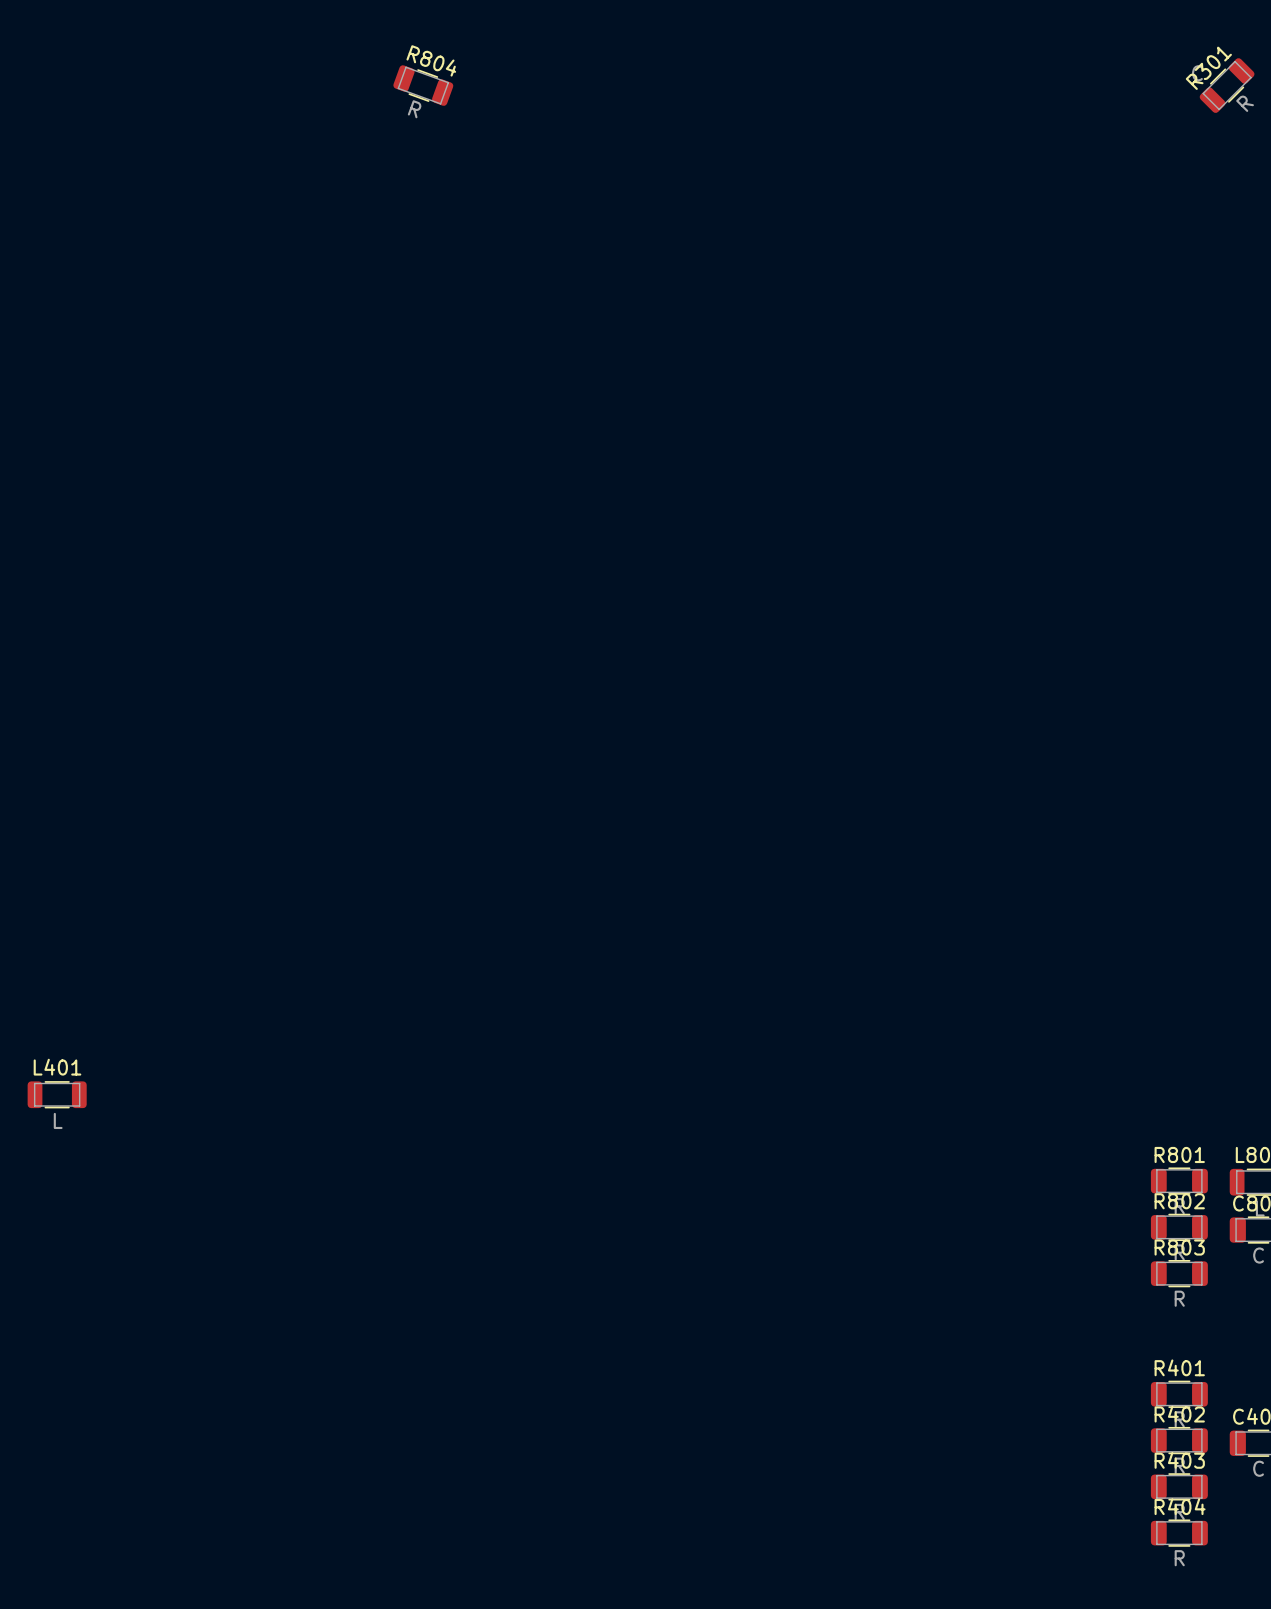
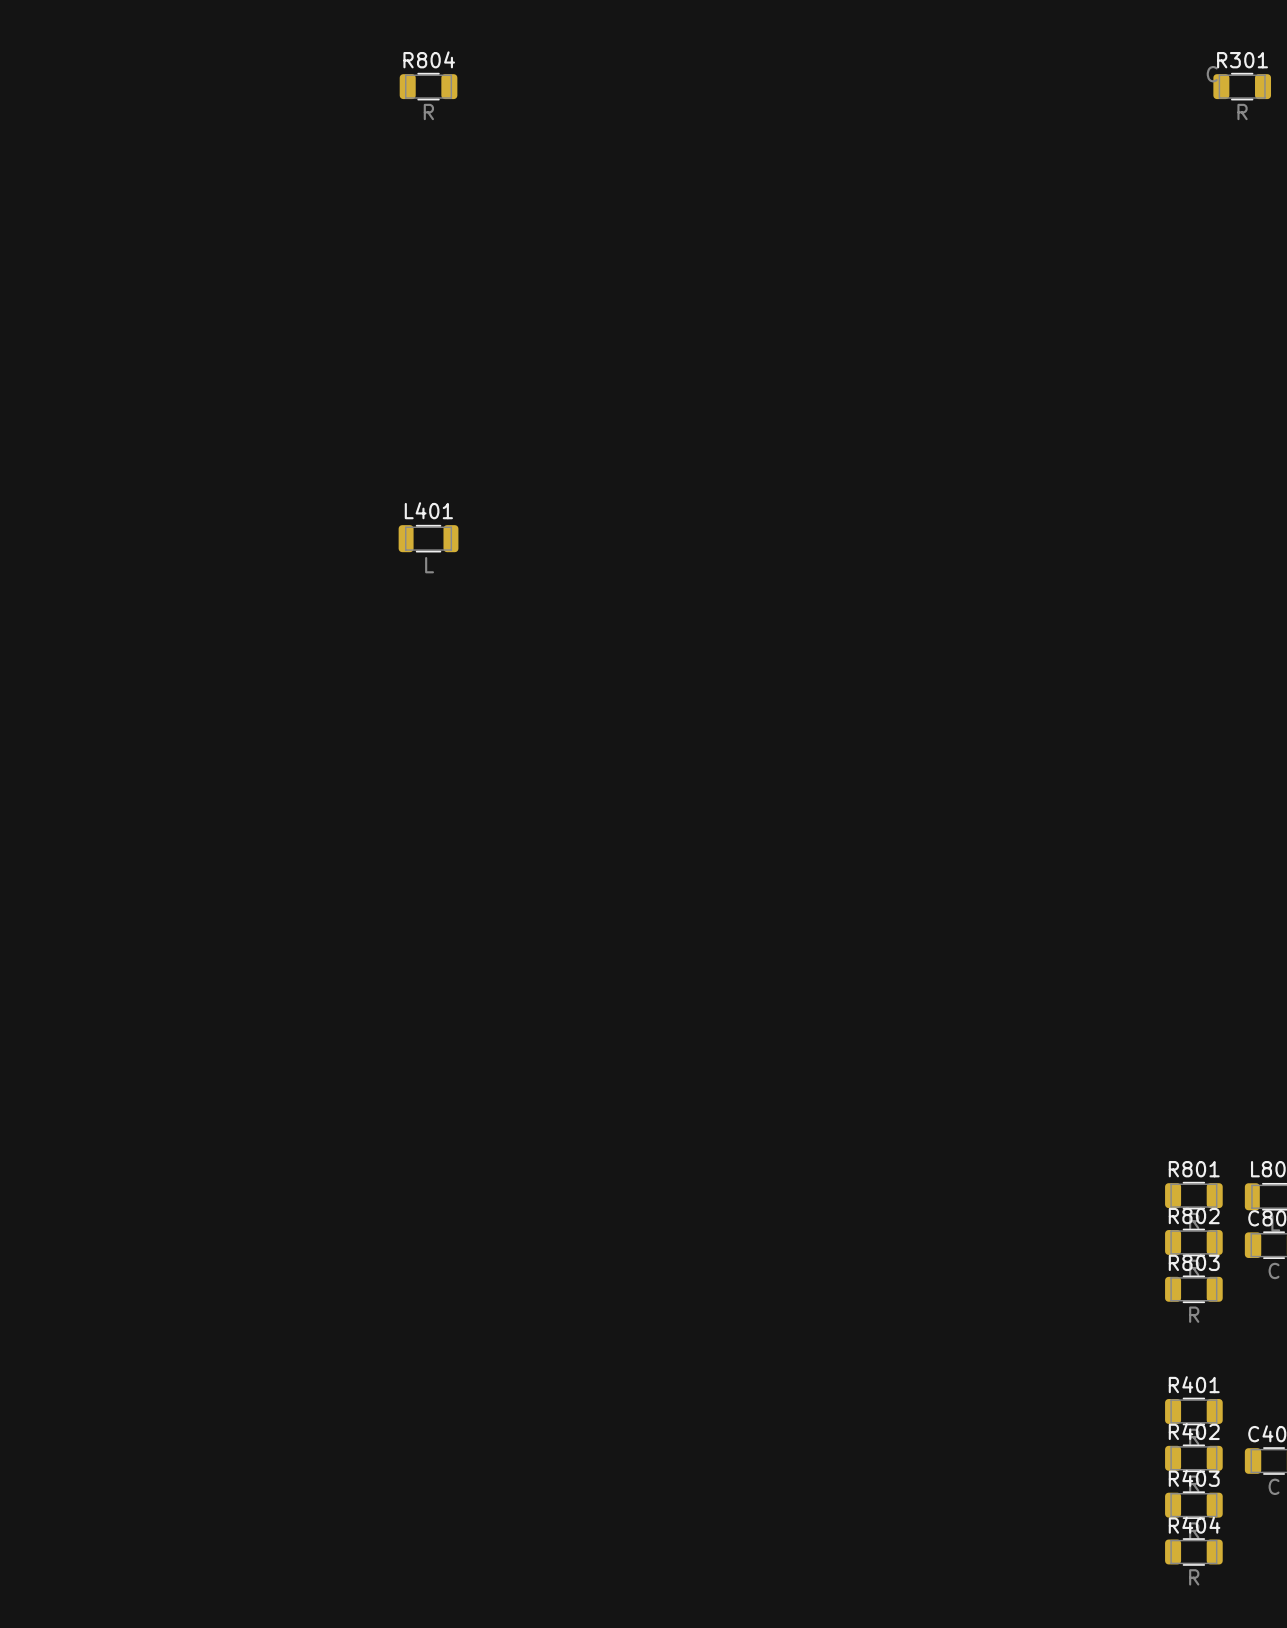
R804 rotation: 0° (423, 85) -> 20° counterclockwise (428, 86)
R301 rotation: 0° (1227, 85) -> 45° clockwise (1242, 86)
L401 position: (57, 1094) -> (428, 538)

